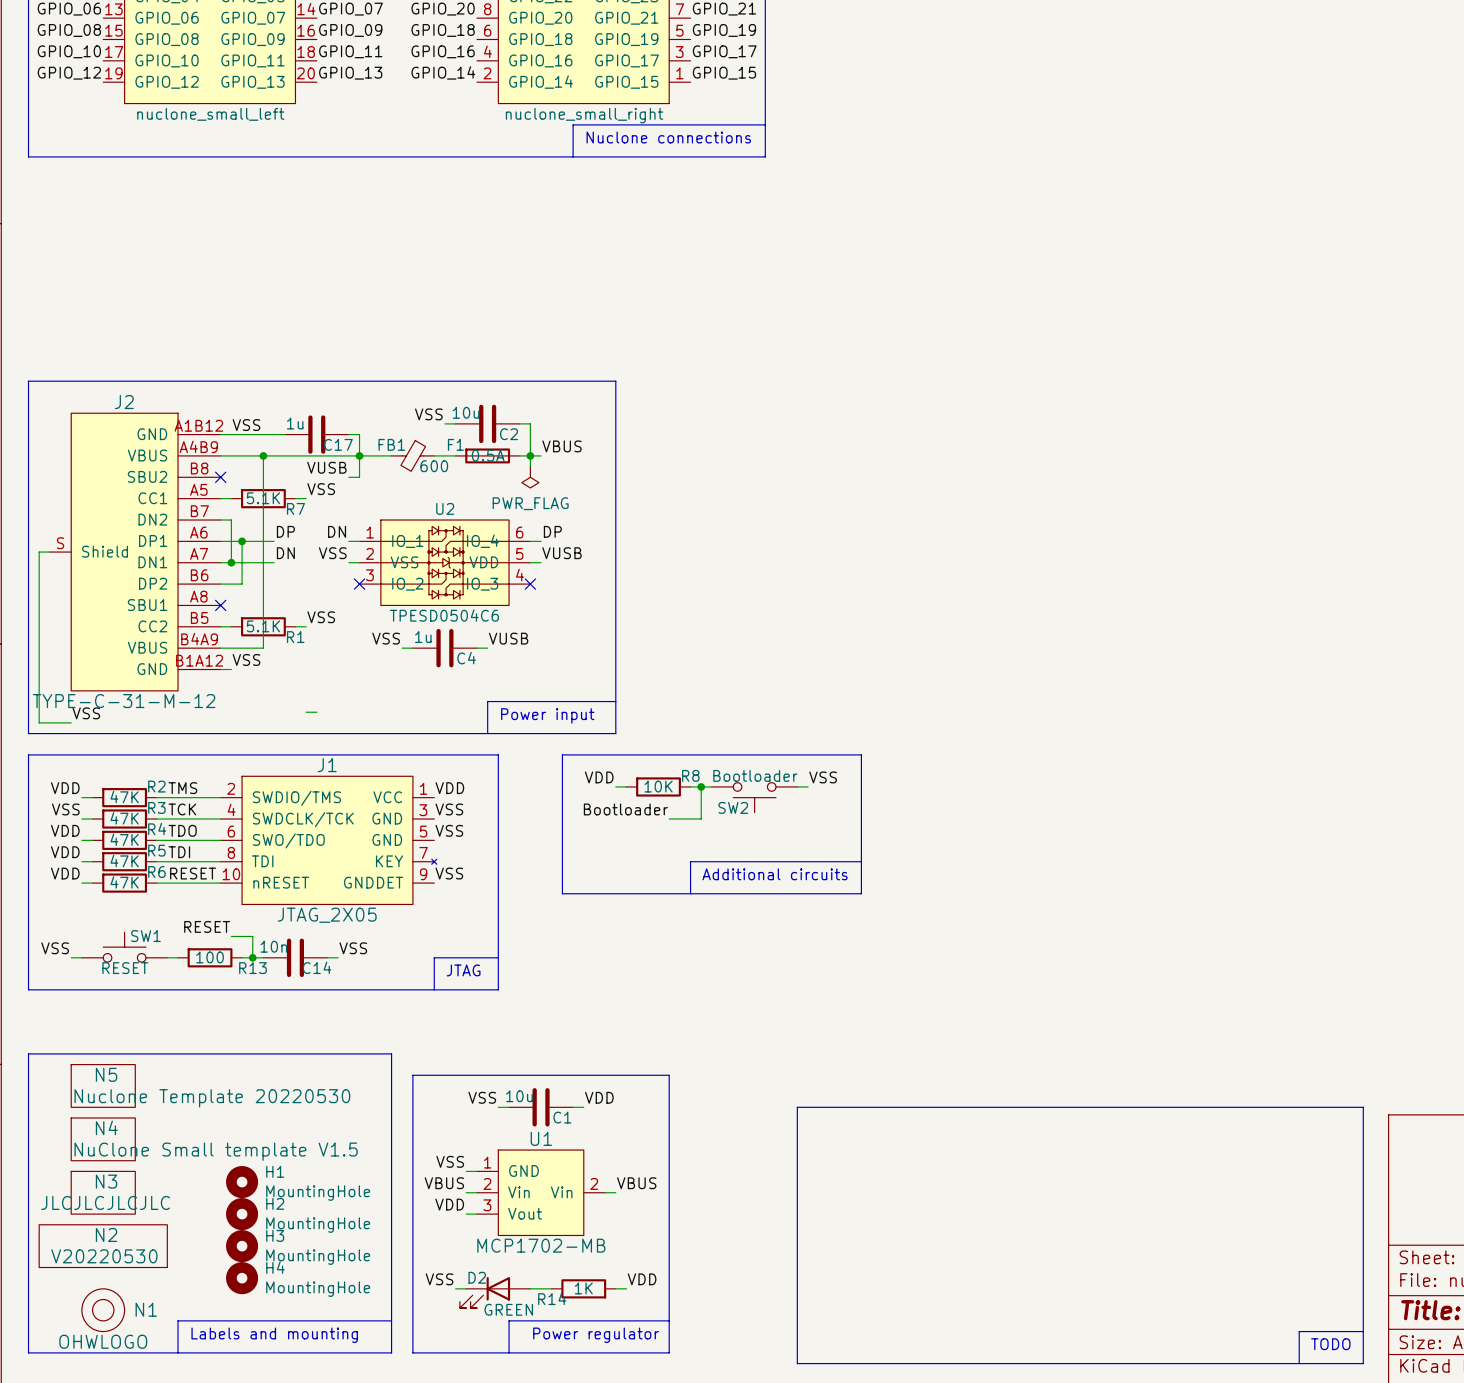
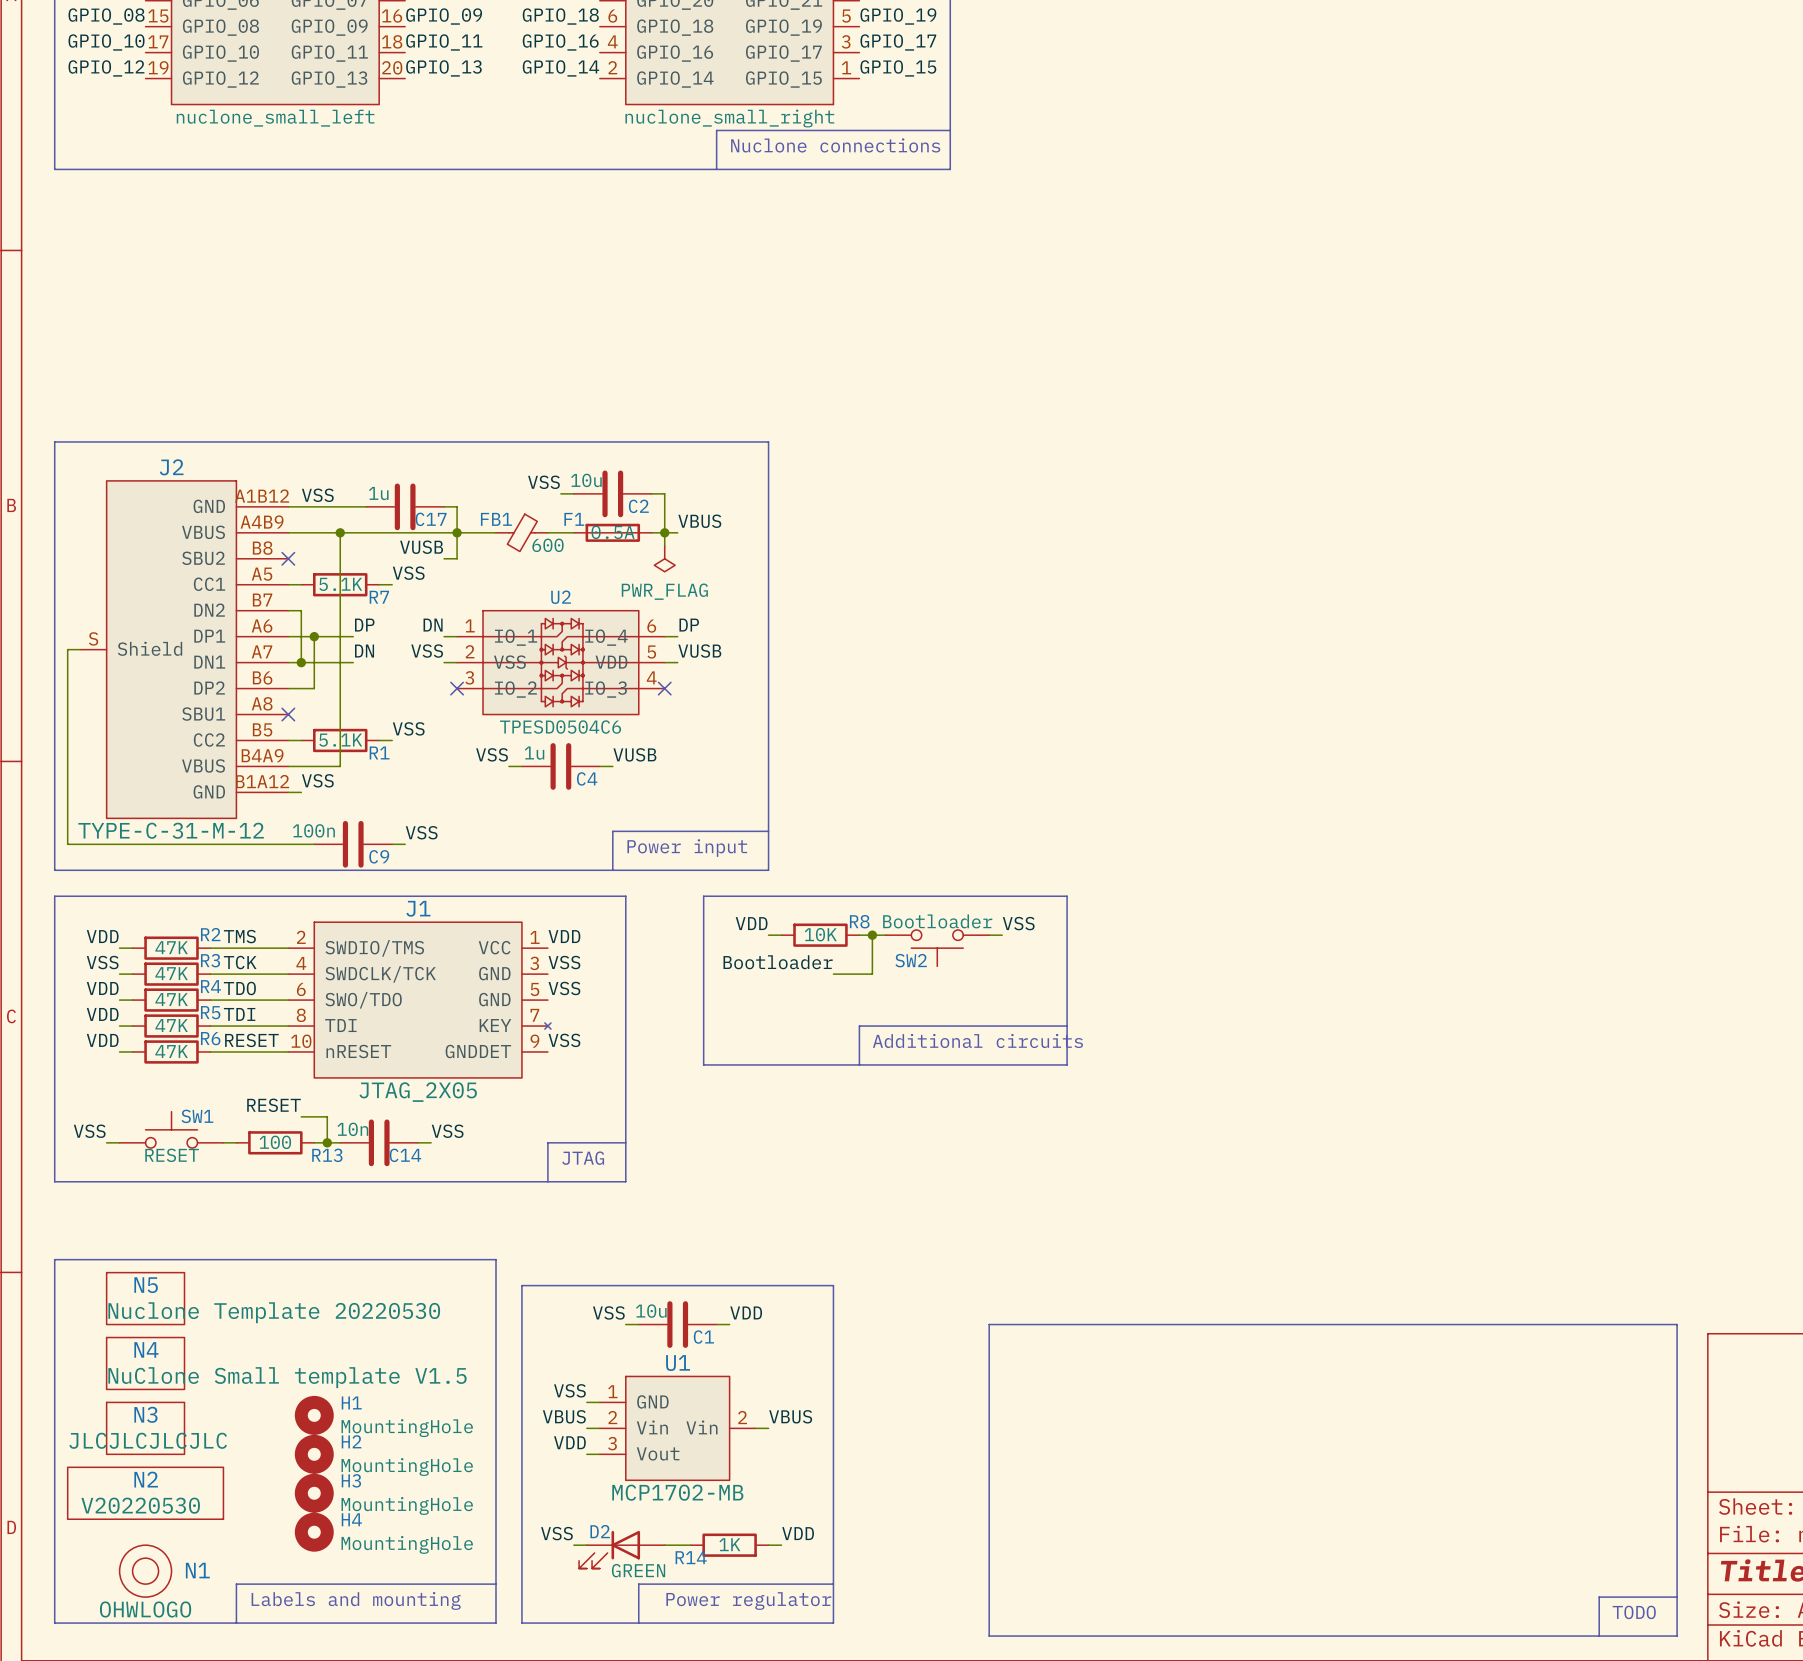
label: none -> VSS (421, 832)
wire: (39, 712) (39, 722) (71, 722) -> (67, 844) (314, 844)
C9: none -> 100n (353, 844)
label: VSS (86, 713) -> none

